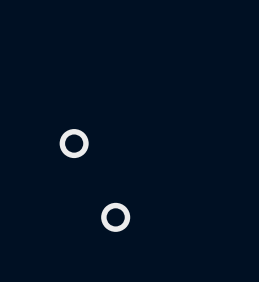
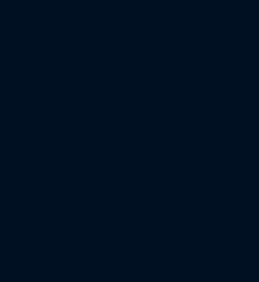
via: (74, 143) -> none
via: (115, 217) -> none

